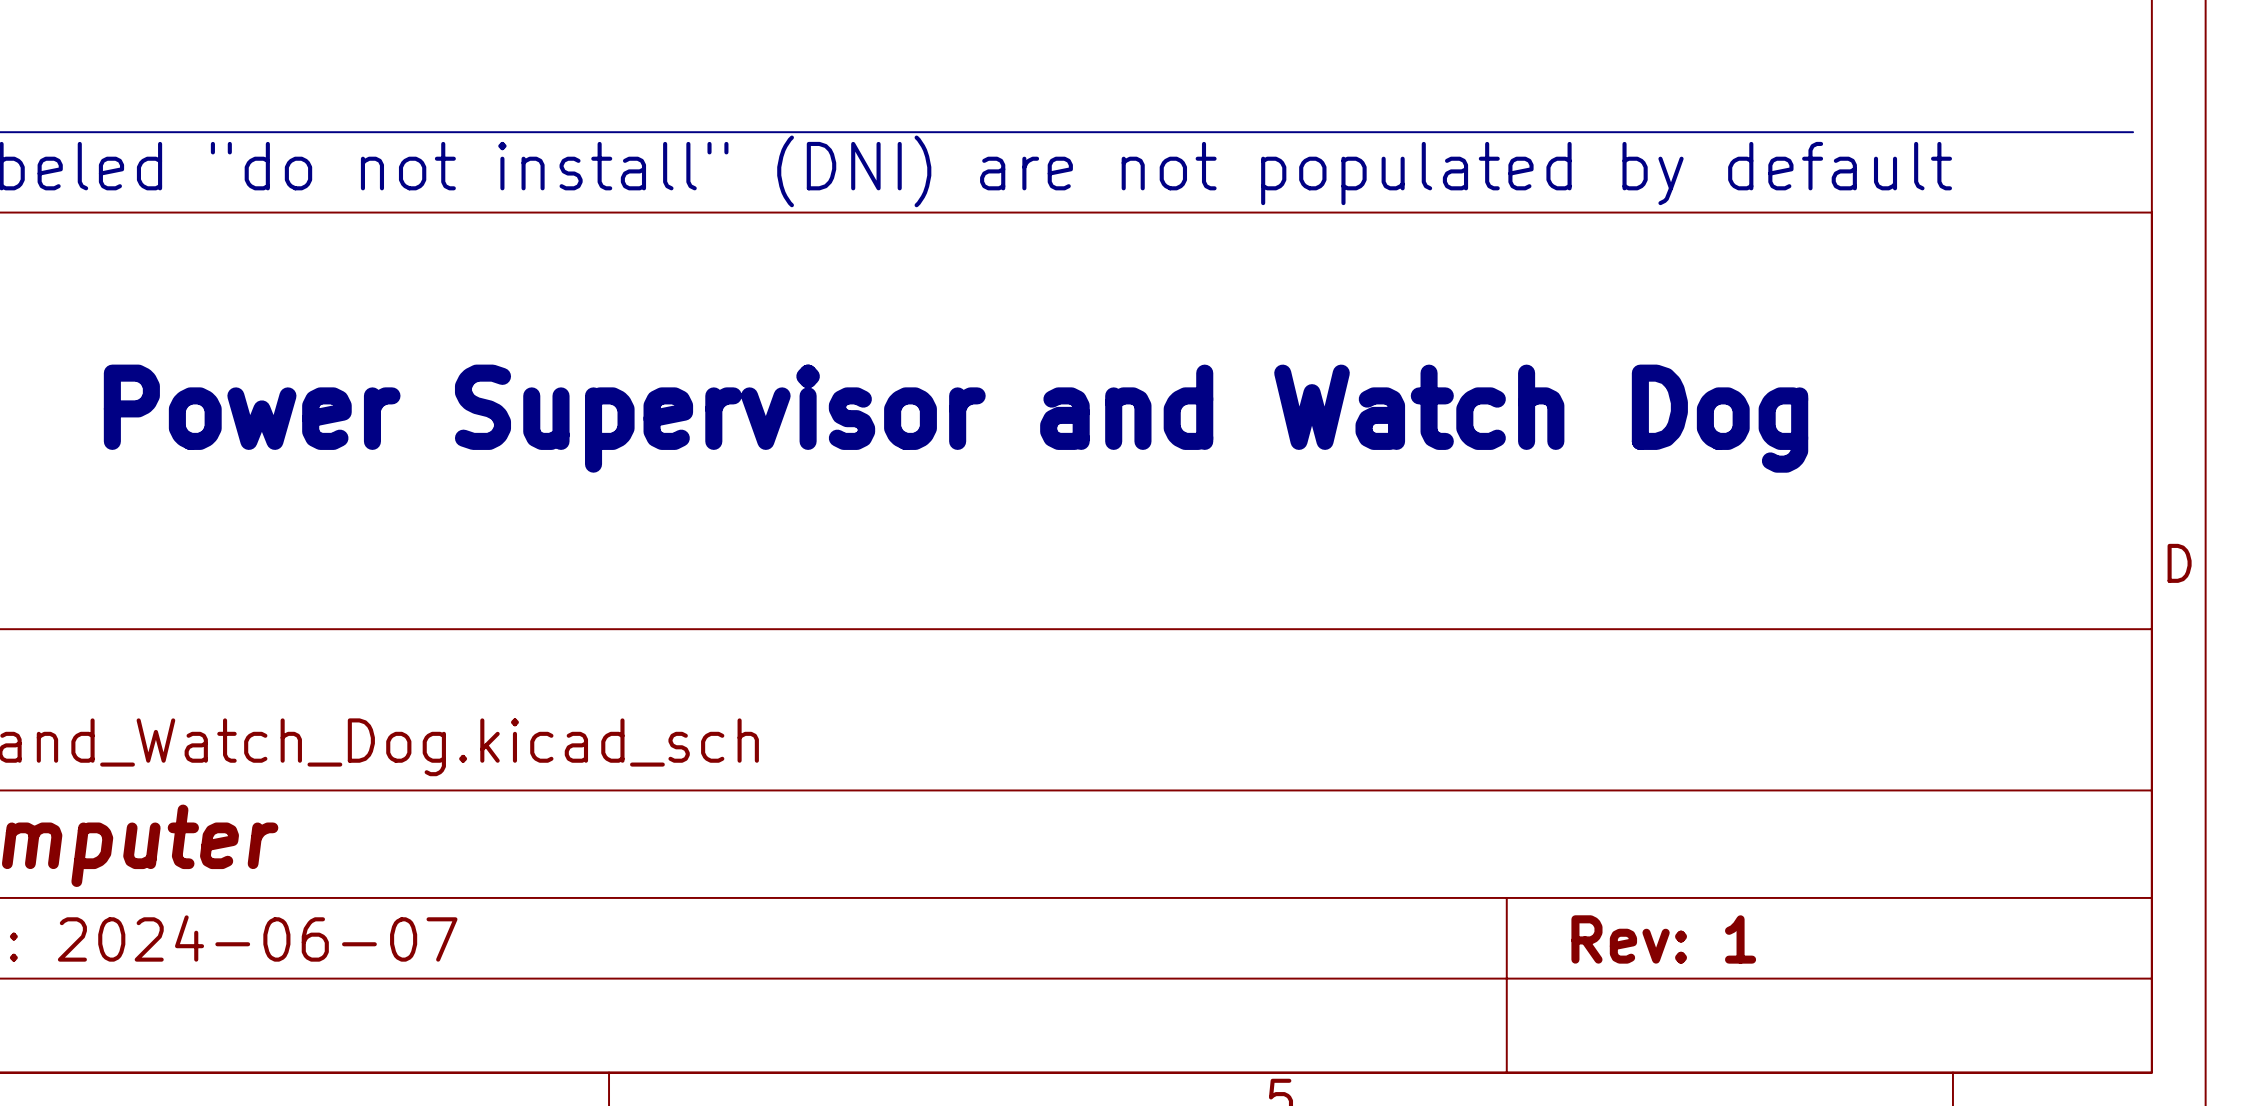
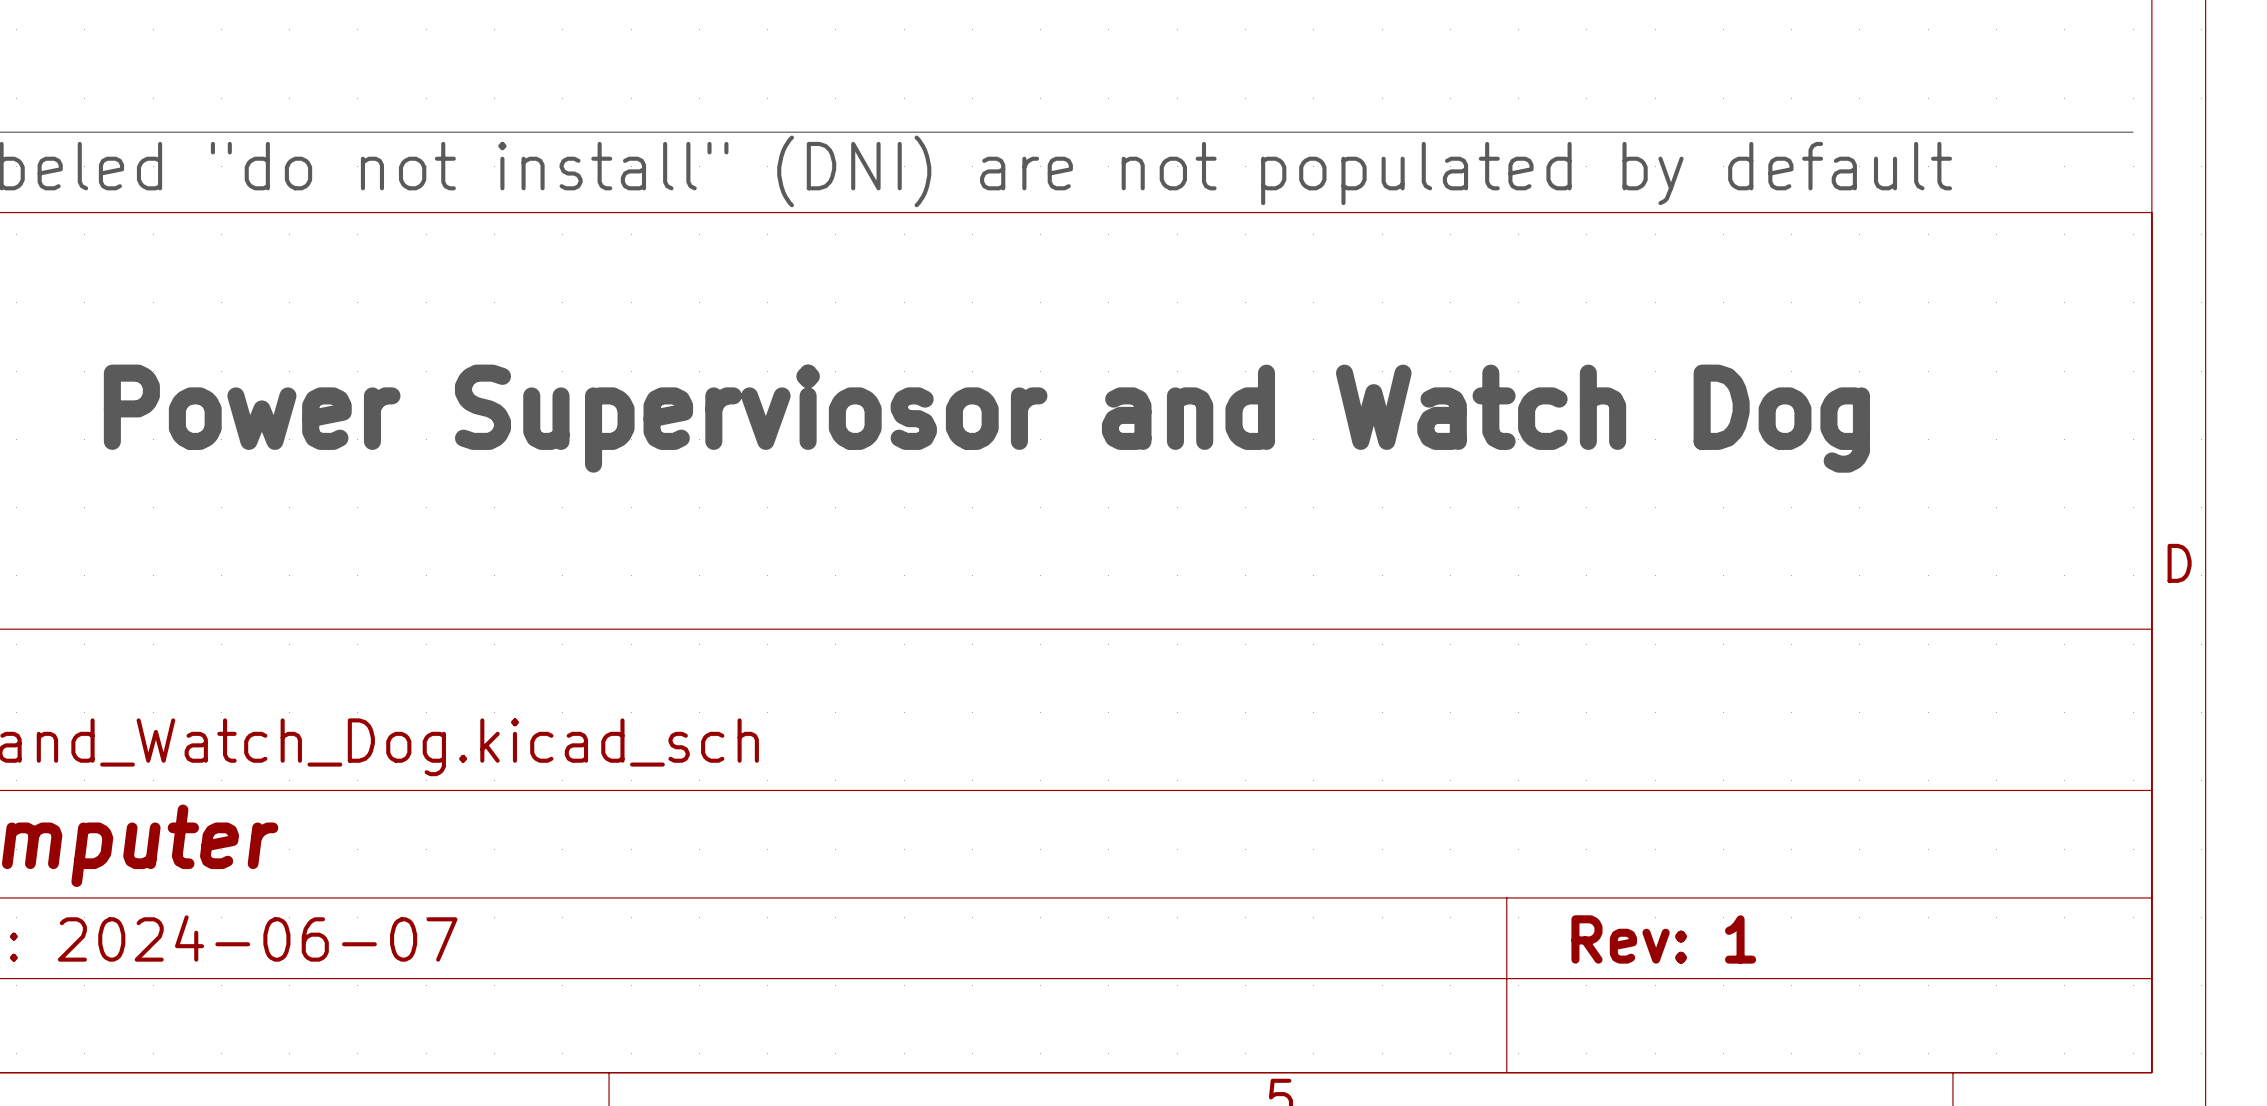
text: Power Supervisor and Watch Dog (956, 418) -> Power Superviosor and Watch Dog (986, 418)

